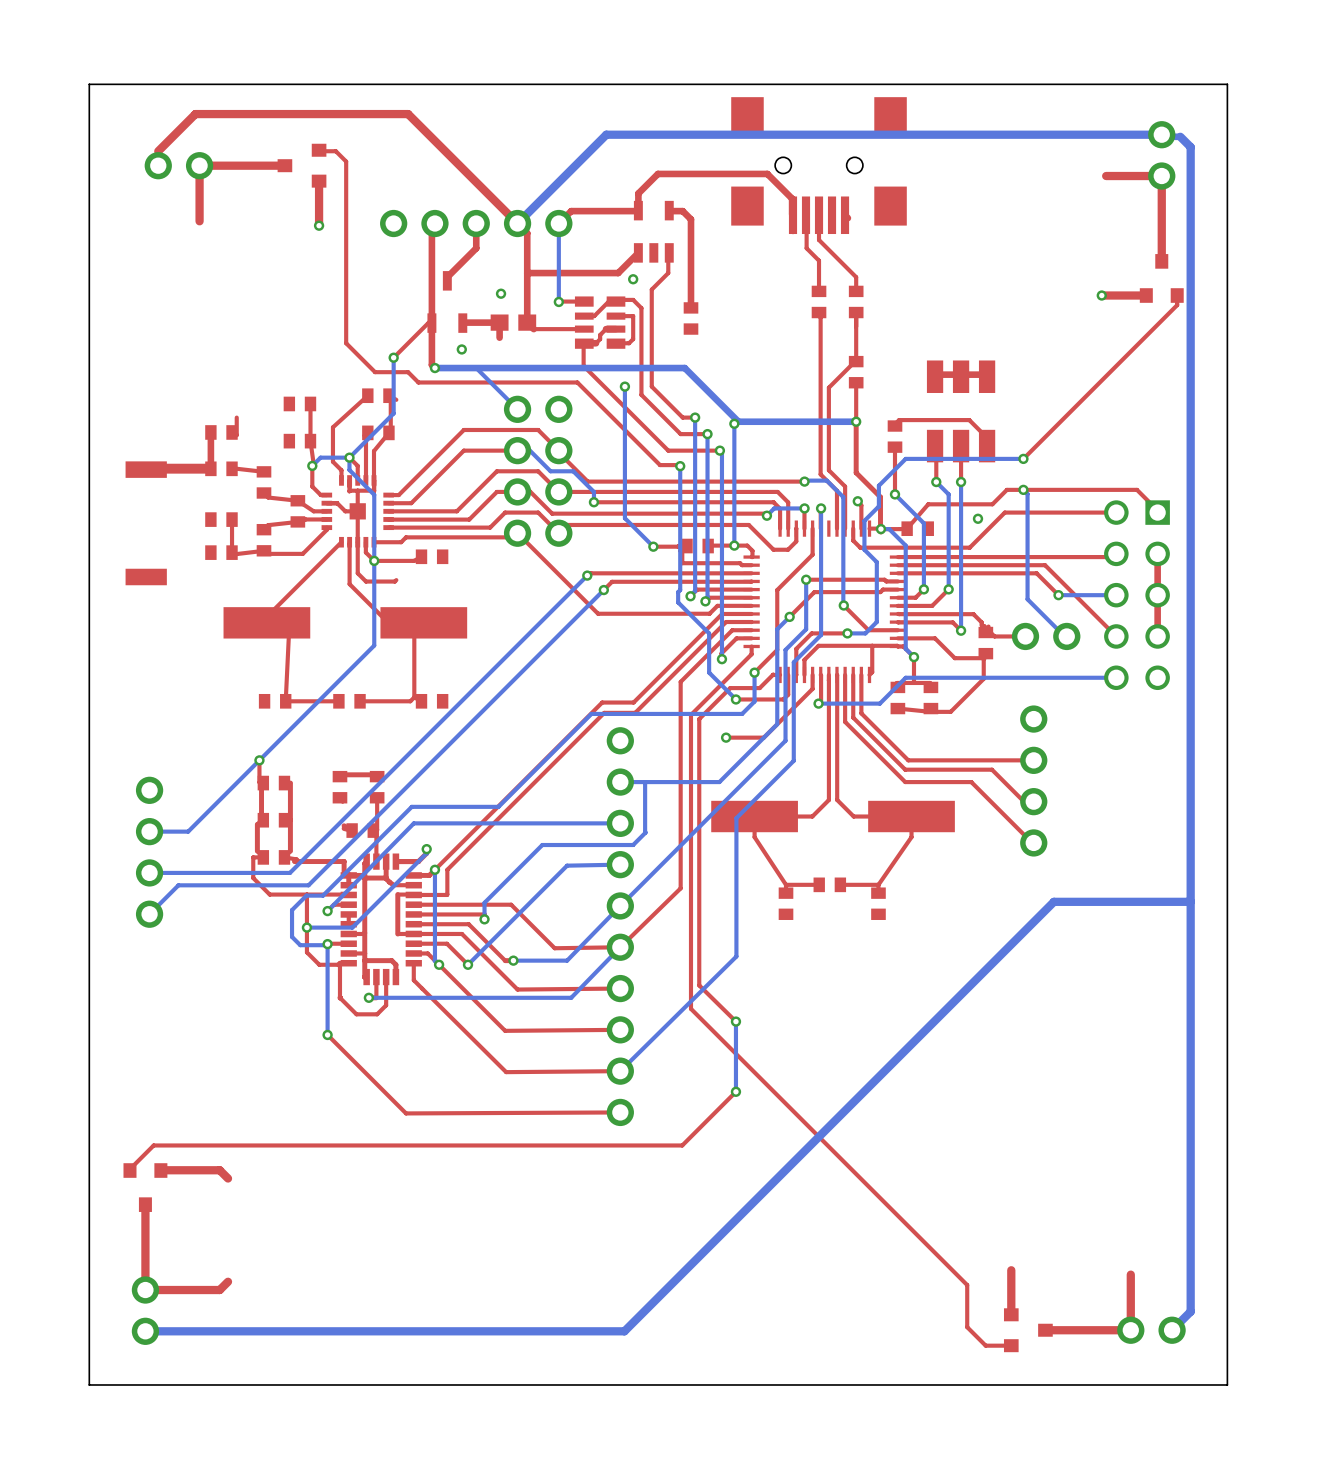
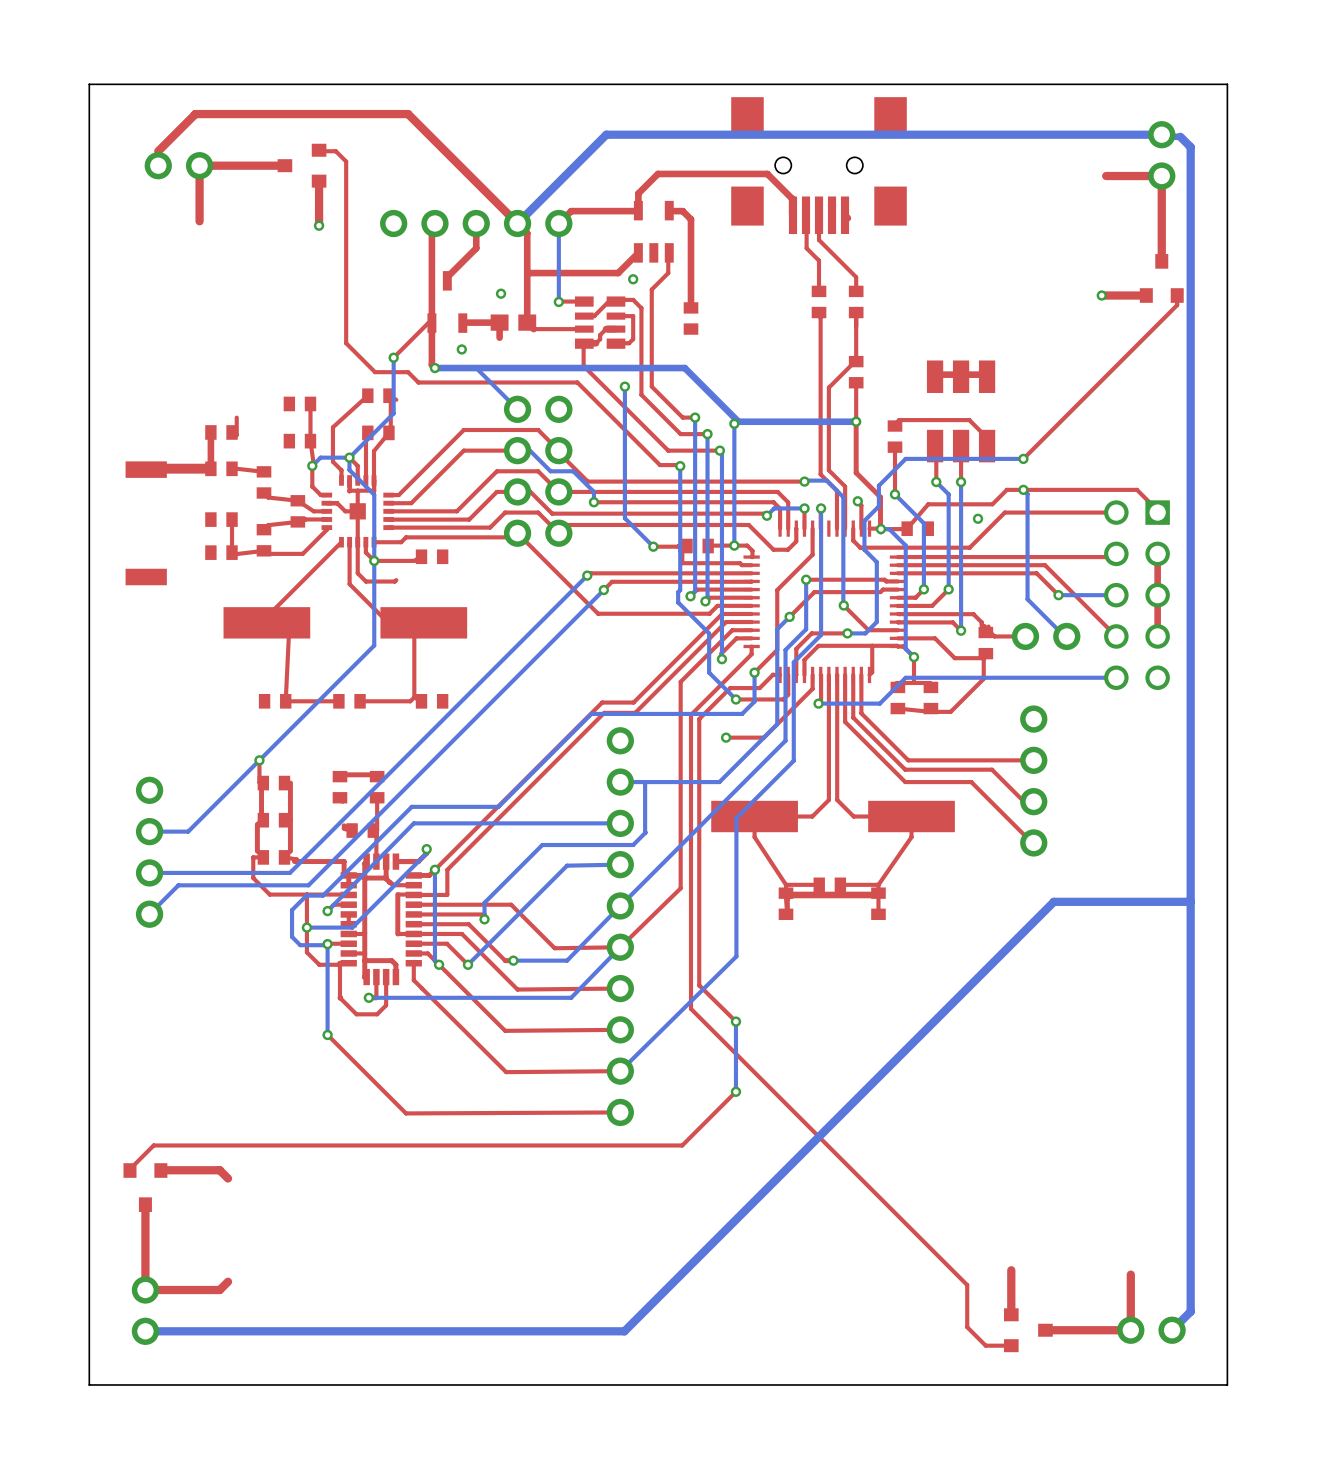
top track: none -> (786, 894) (787, 914) (787, 899) (791, 894) (878, 894) (878, 914)

